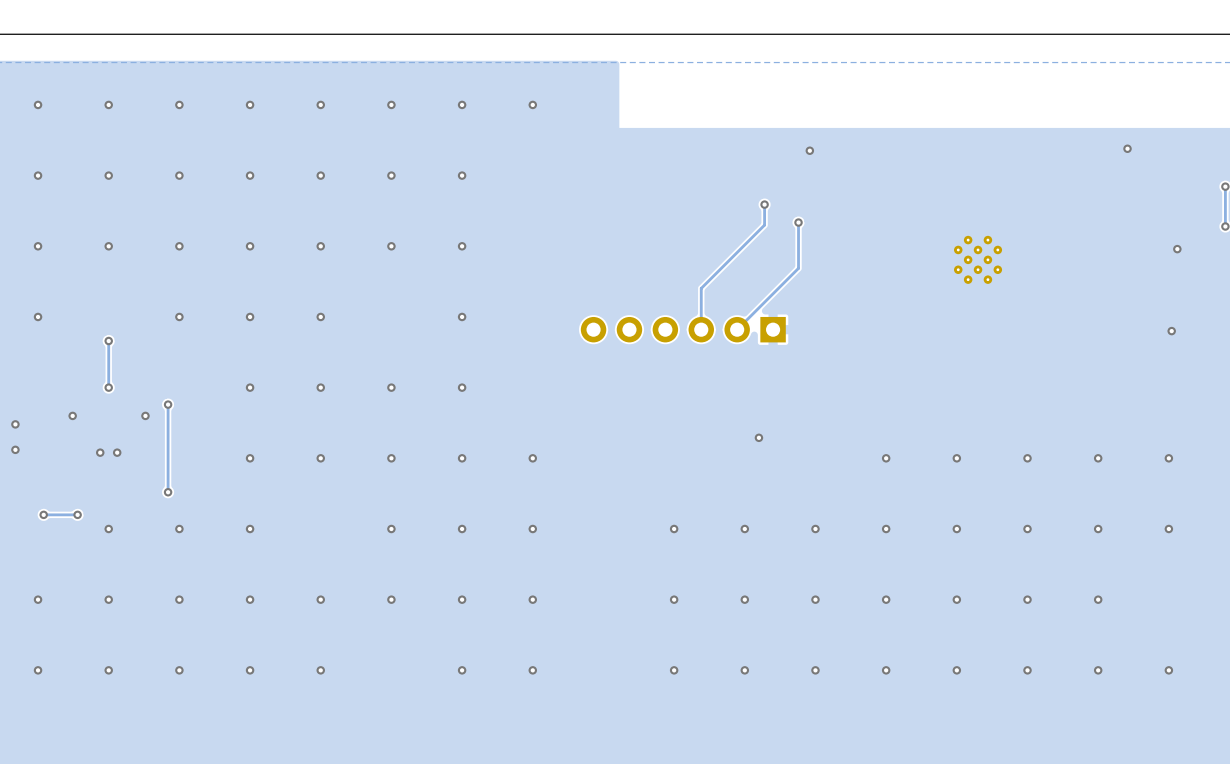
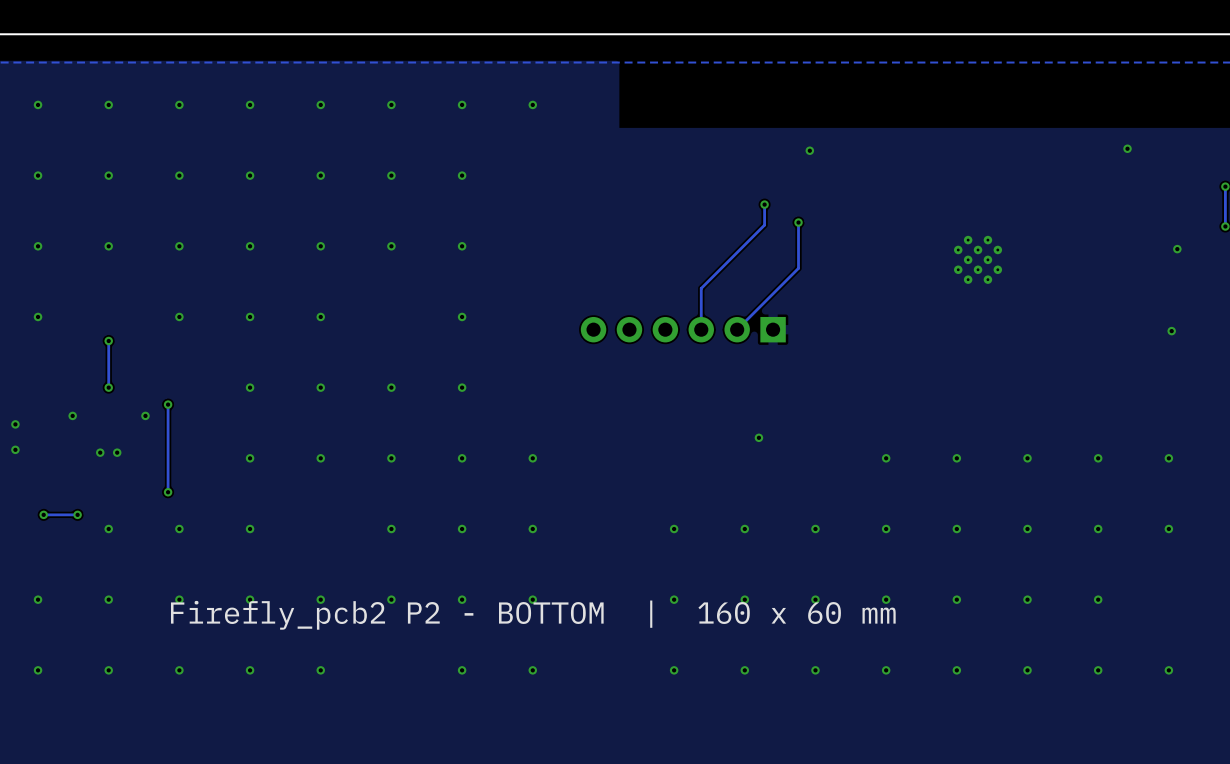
text: none -> Firefly_pcb2 P2 - BOTTOM | 160 x 60 mm (533, 615)

